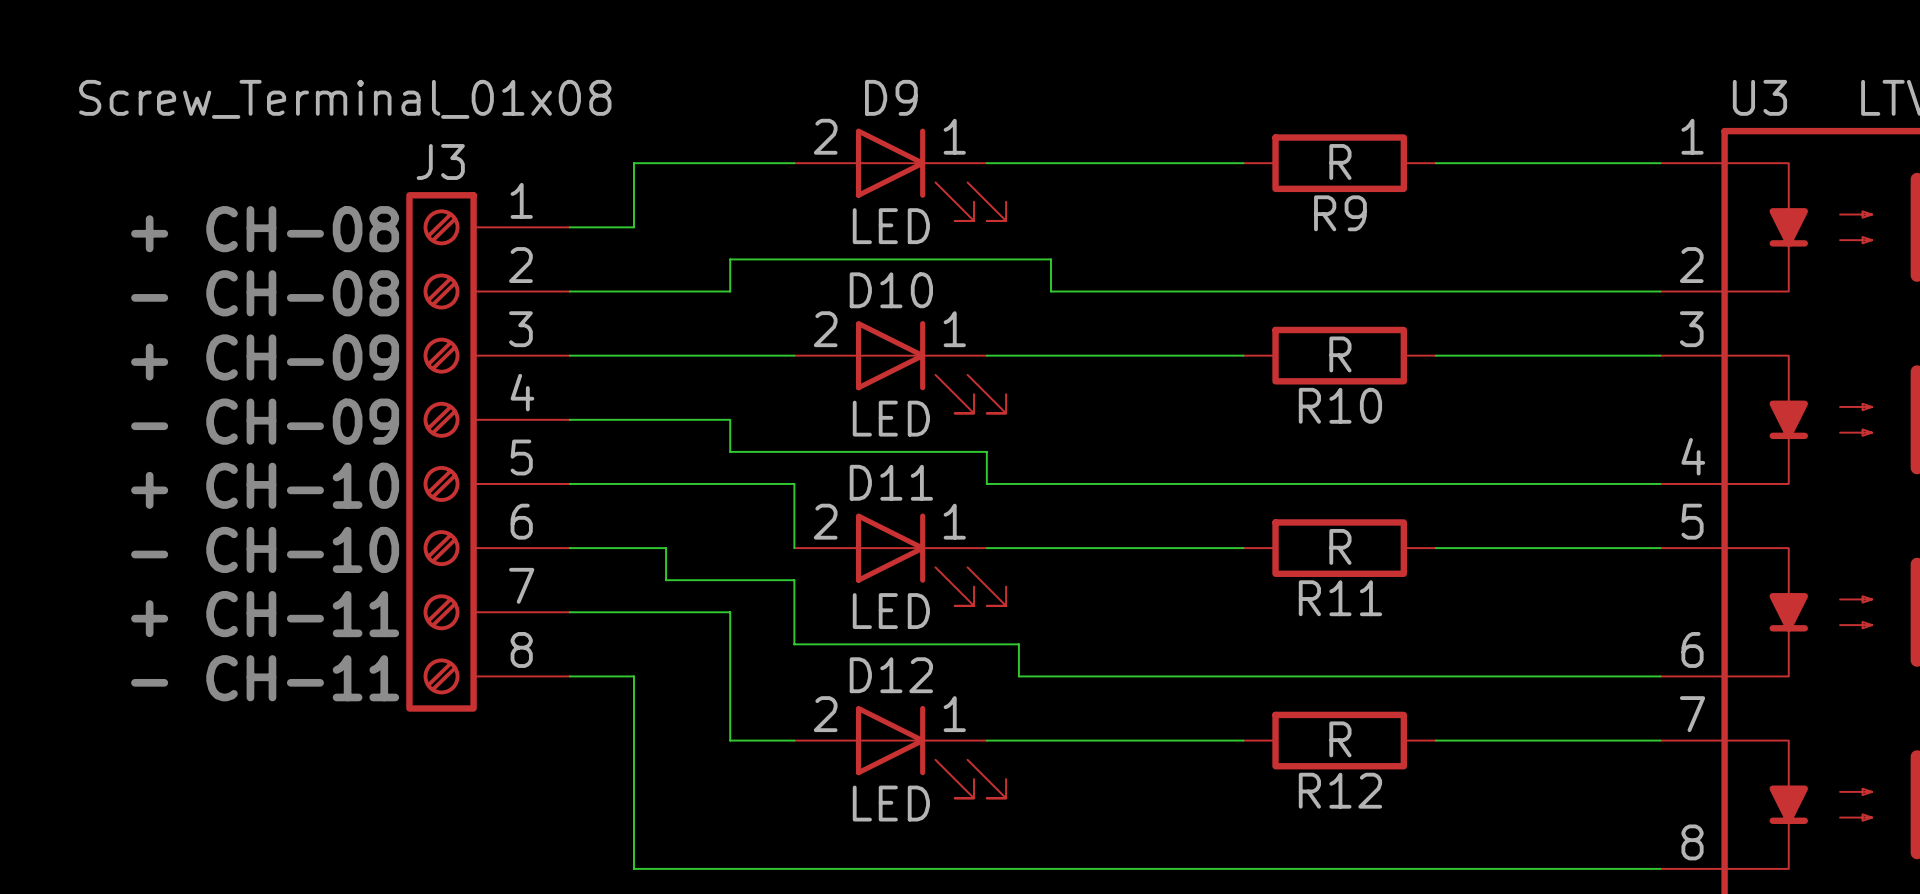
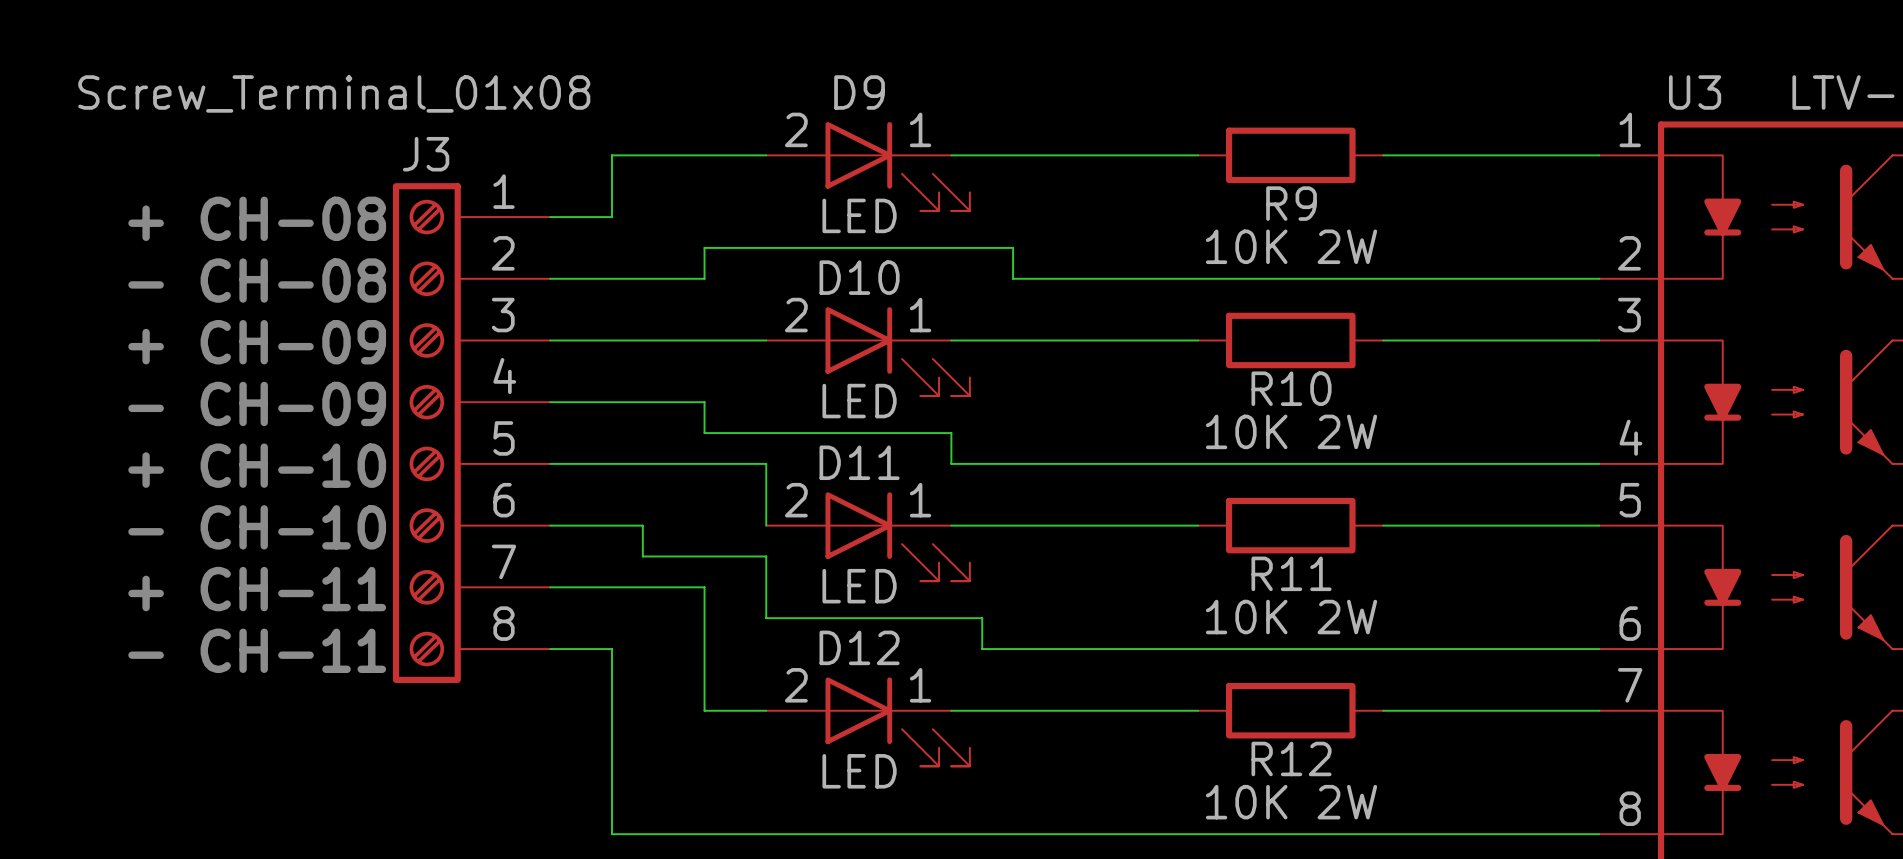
R9 value: R (1340, 161) -> 10K 2W (1291, 246)
R10 value: R (1340, 354) -> 10K 2W (1291, 431)
R11 value: R (1340, 546) -> 10K 2W (1291, 617)
R12 value: R (1340, 739) -> 10K 2W (1291, 802)

